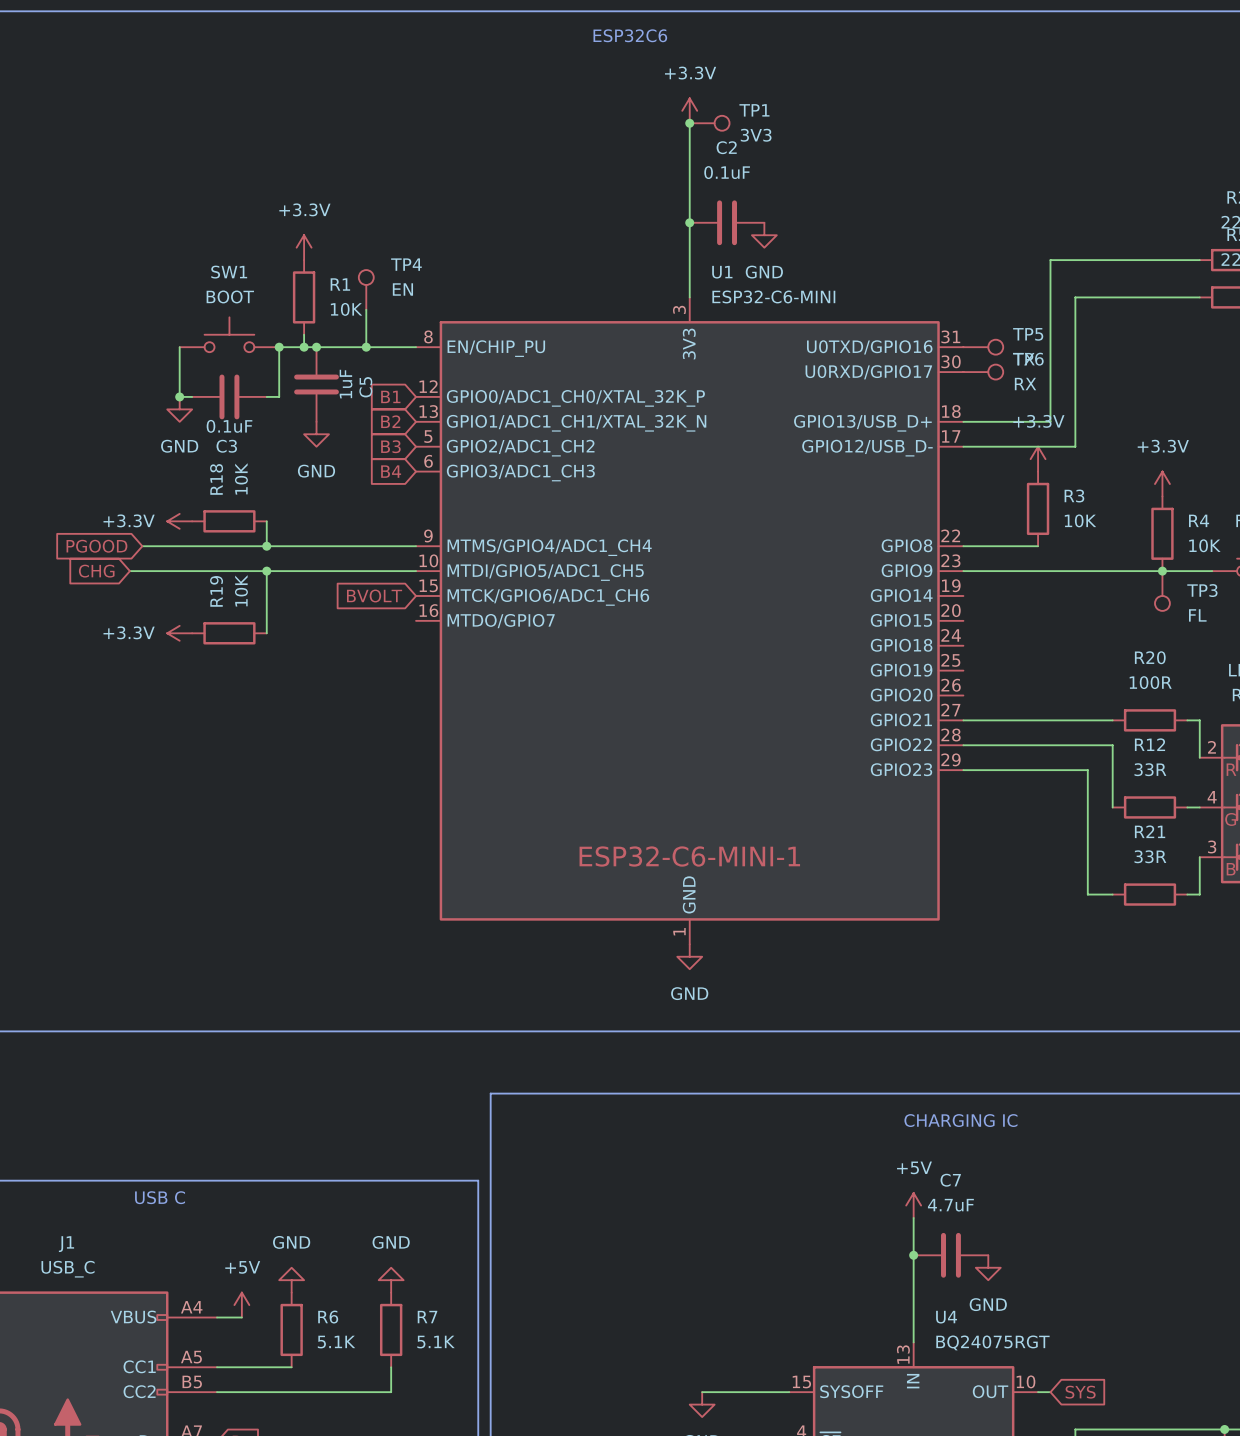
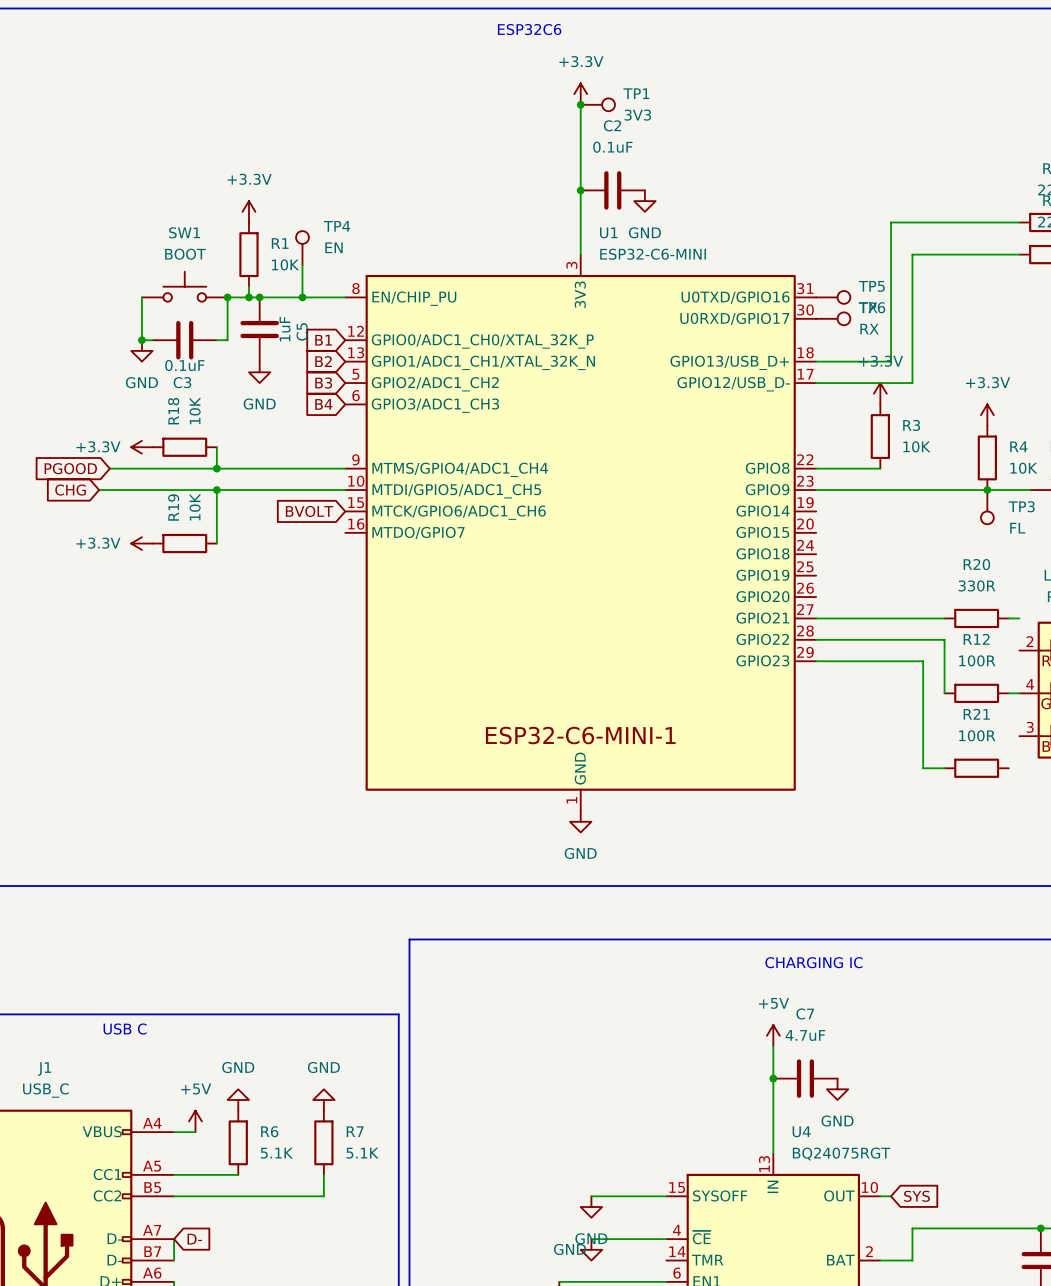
R20 value: 100R (1150, 682) -> 330R (977, 585)
wire: (1199, 720) (1199, 757) -> none
R12 value: 33R (1150, 769) -> 100R (977, 660)
R21 value: 33R (1150, 856) -> 100R (977, 735)
wire: (1199, 857) (1199, 894) (1187, 894) -> none

